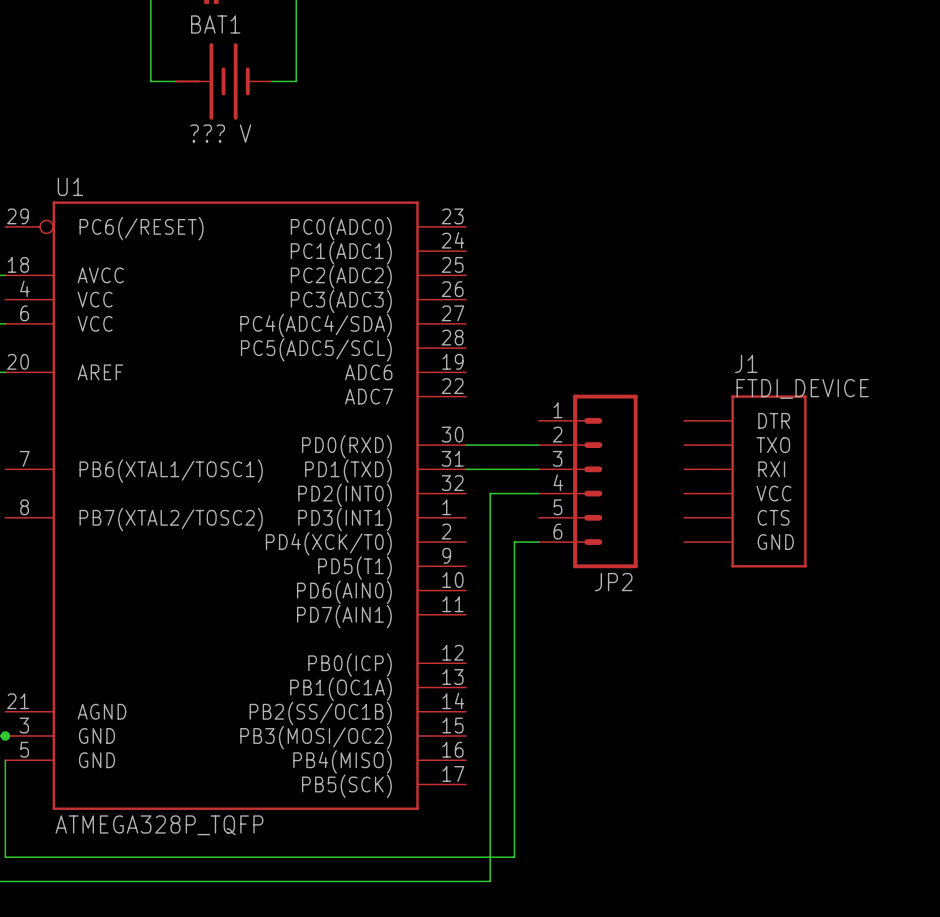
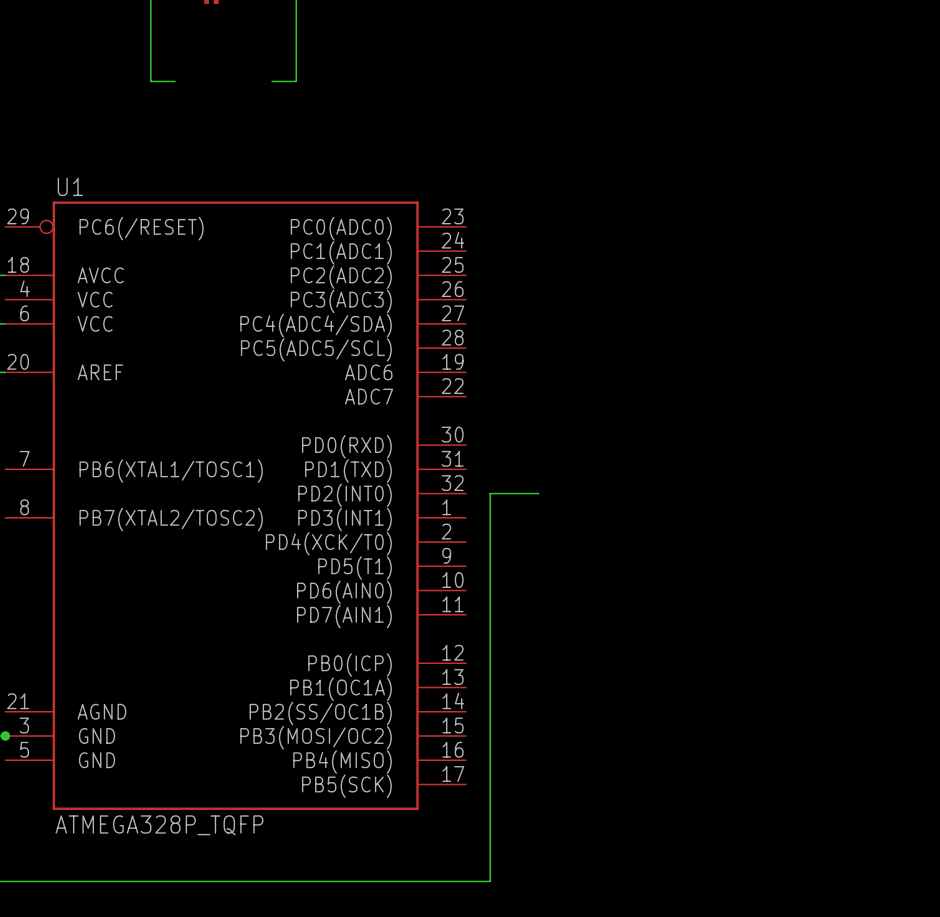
BAT1: ??? V (223, 81) -> none
wire: (465, 445) (538, 445) -> none
wire: (465, 469) (538, 469) -> none
JP2: (588, 481) -> none
J1: FTDI_DEVICE (745, 481) -> none
wire: (538, 542) (514, 542) (514, 857) (5, 857) (5, 760) -> none

